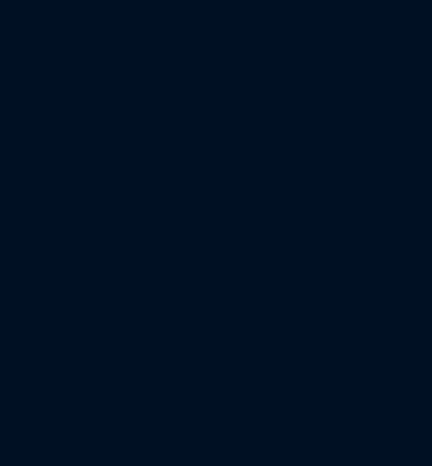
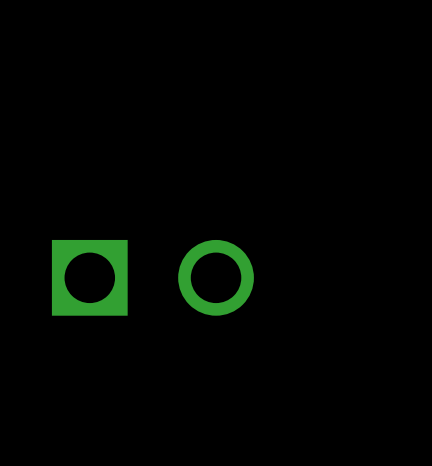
part: none -> (152, 277)

